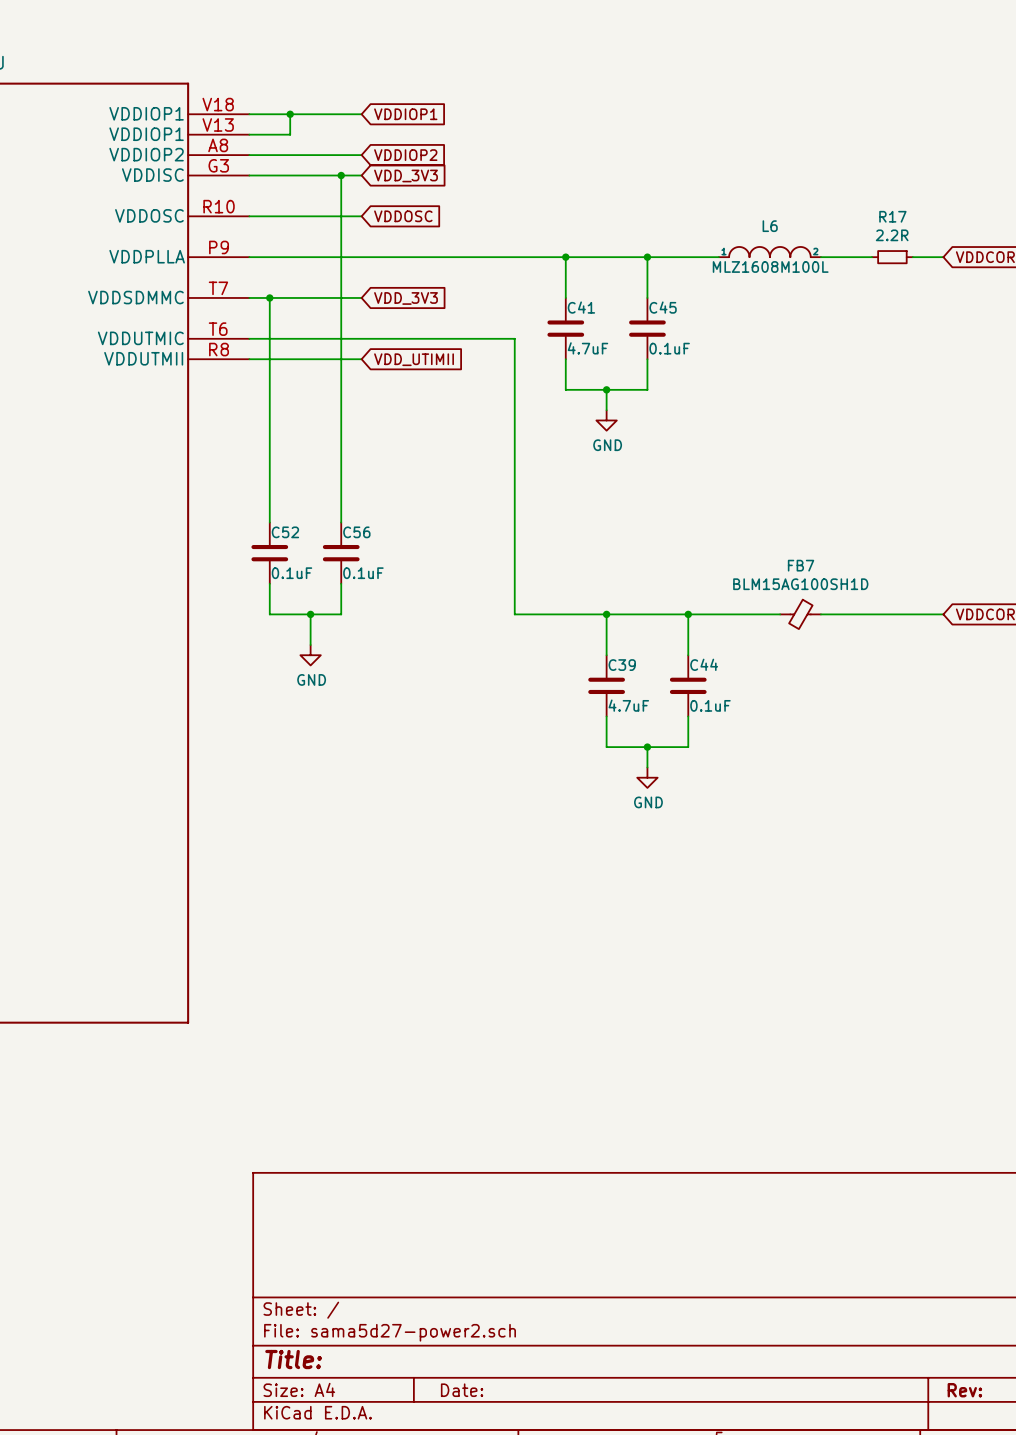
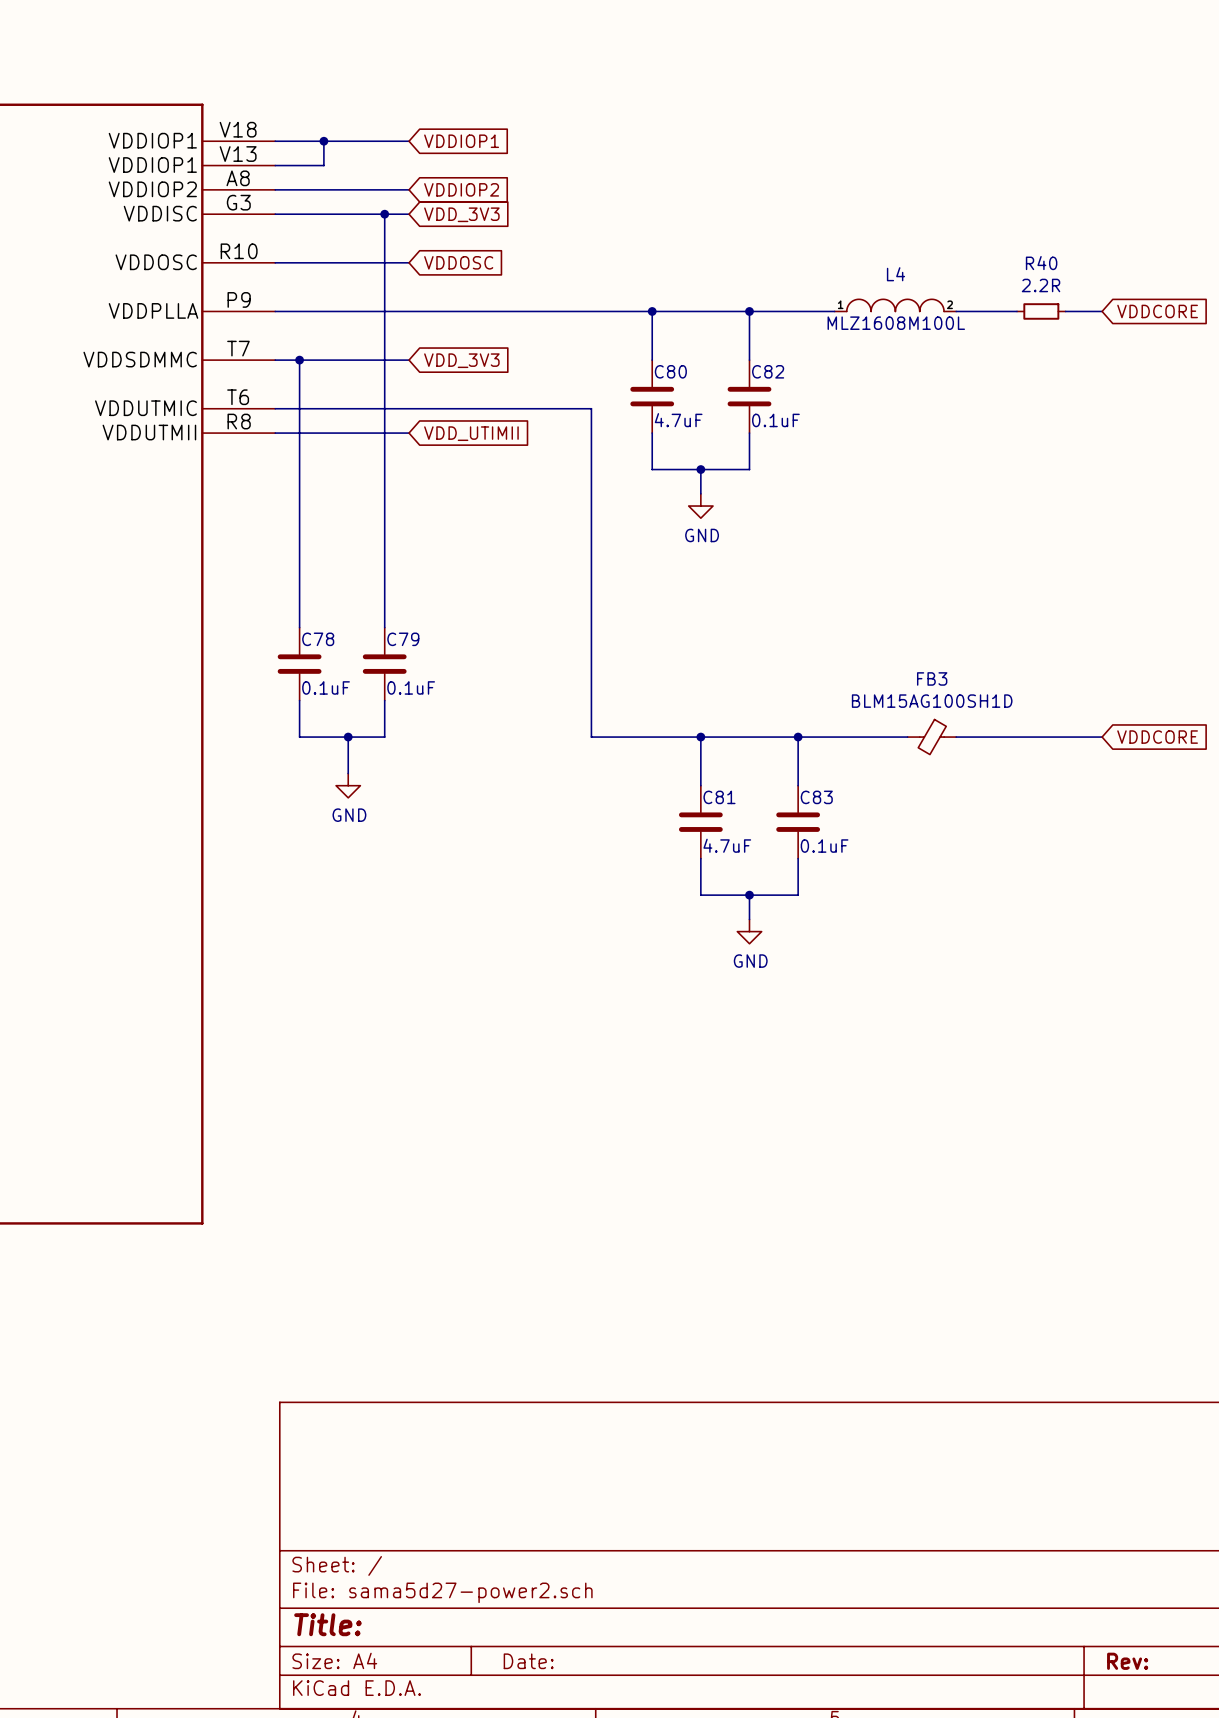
R17 name: R17 (892, 216) -> R40 (1041, 263)
L6 name: L6 (770, 226) -> L4 (895, 274)
C41 name: C41 (581, 307) -> C80 (670, 371)
C45 name: C45 (663, 307) -> C82 (768, 371)
C52 name: C52 (285, 532) -> C78 (318, 639)
C56 name: C56 (356, 532) -> C79 (403, 639)
FB7 name: FB7 (801, 565) -> FB3 (932, 678)
C44 name: C44 (704, 664) -> C83 (816, 797)
C39 name: C39 (622, 665) -> C81 (719, 797)

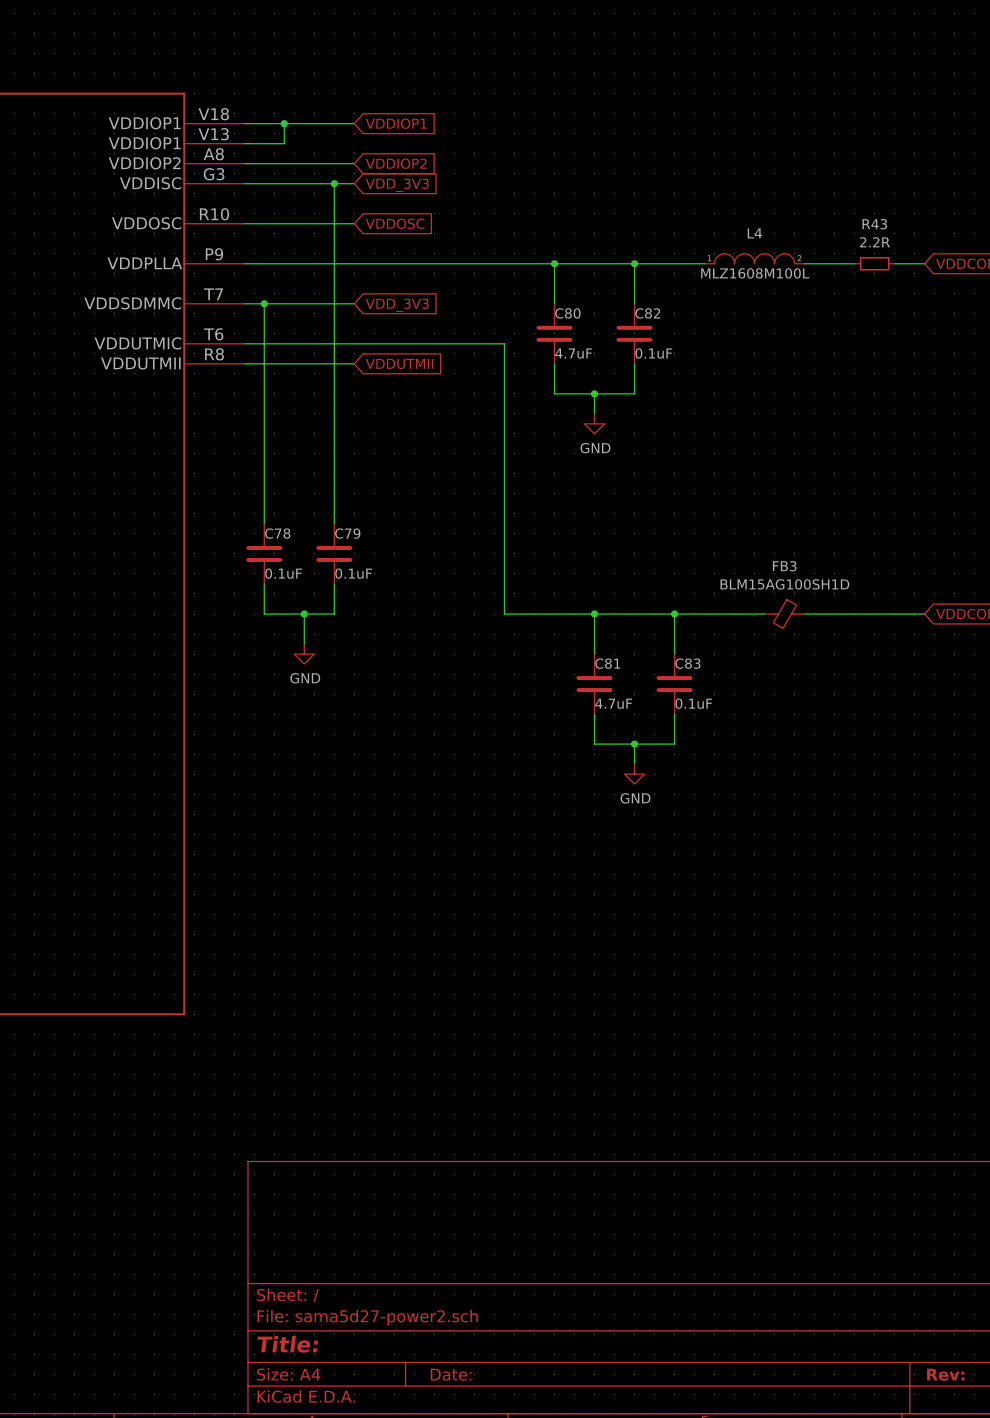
R40 name: R40 (1041, 263) -> R43 (874, 224)
global label: VDD_UTIMII (471, 433) -> VDDUTMII (399, 363)

